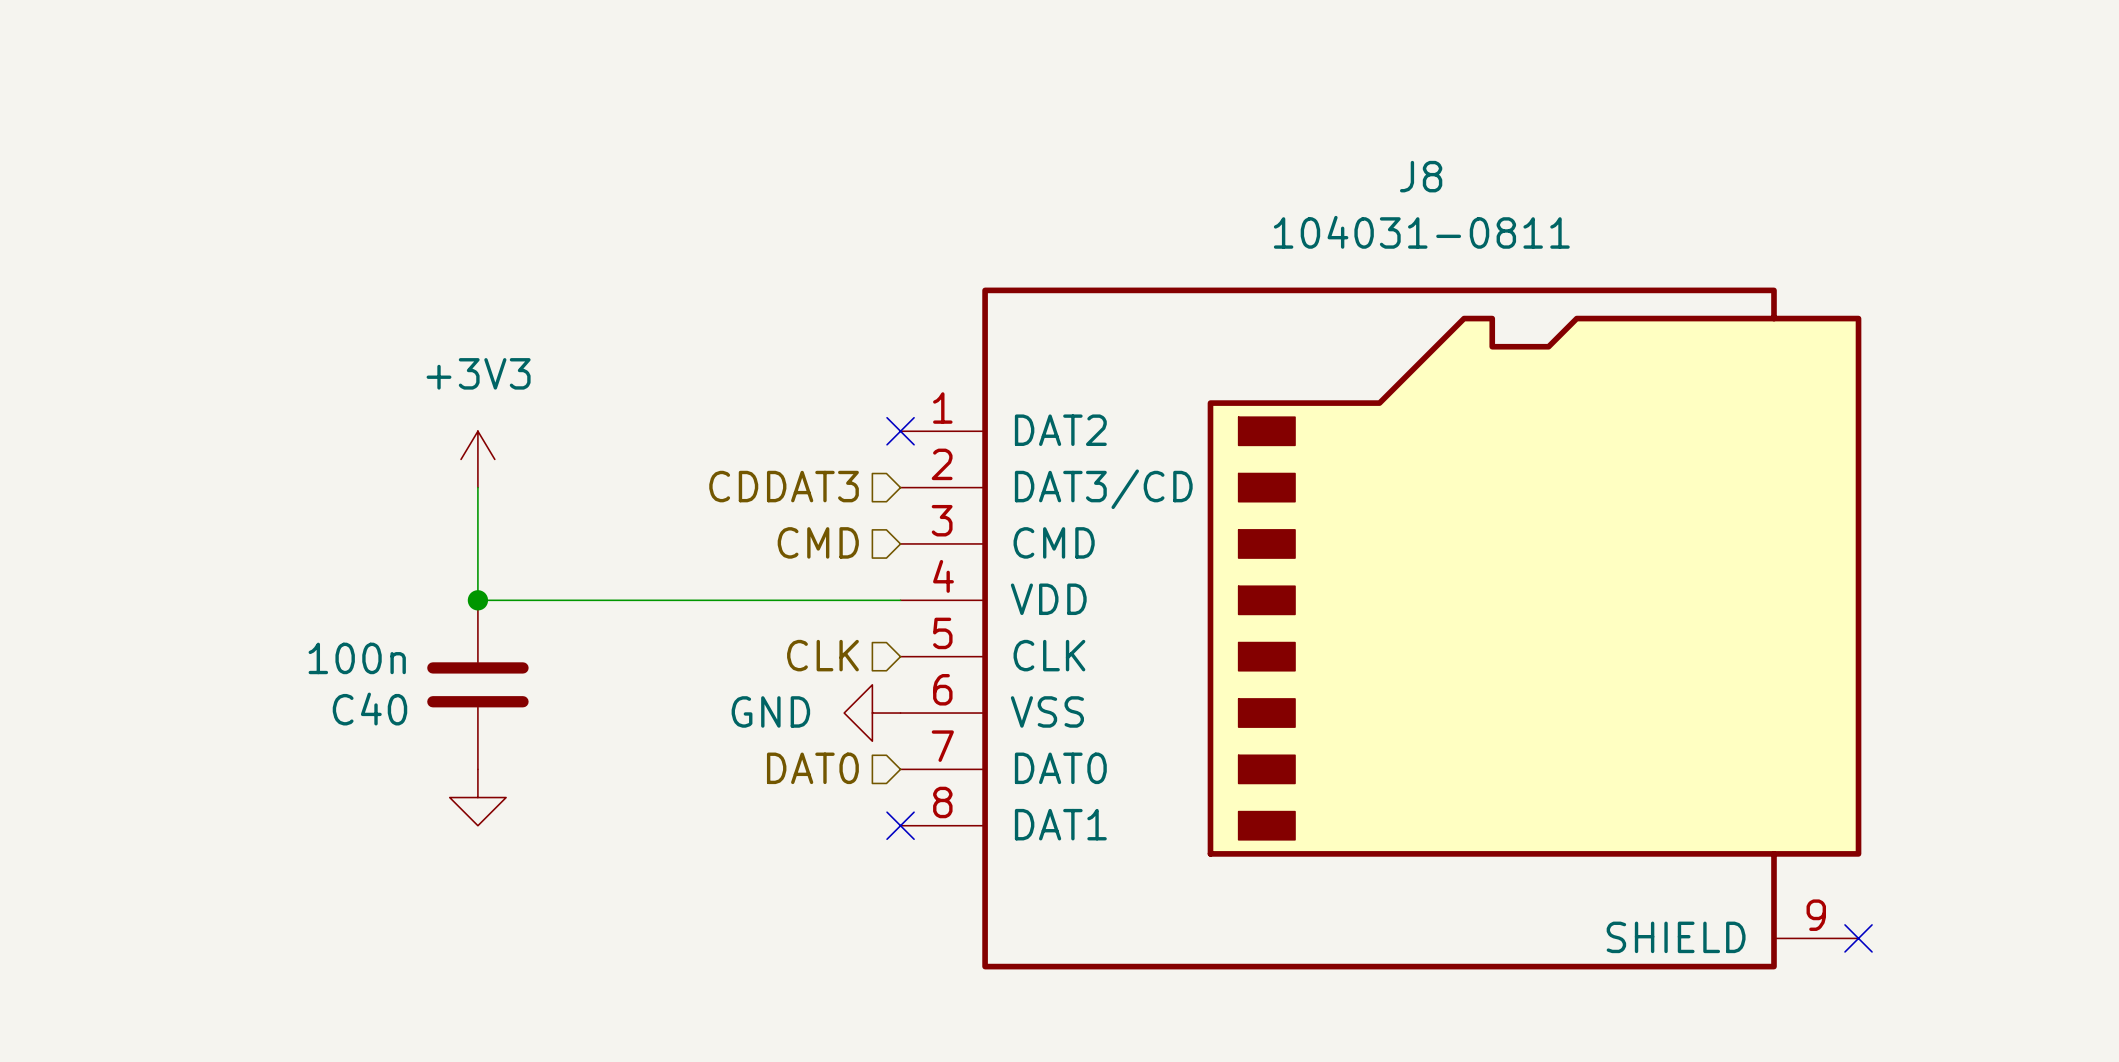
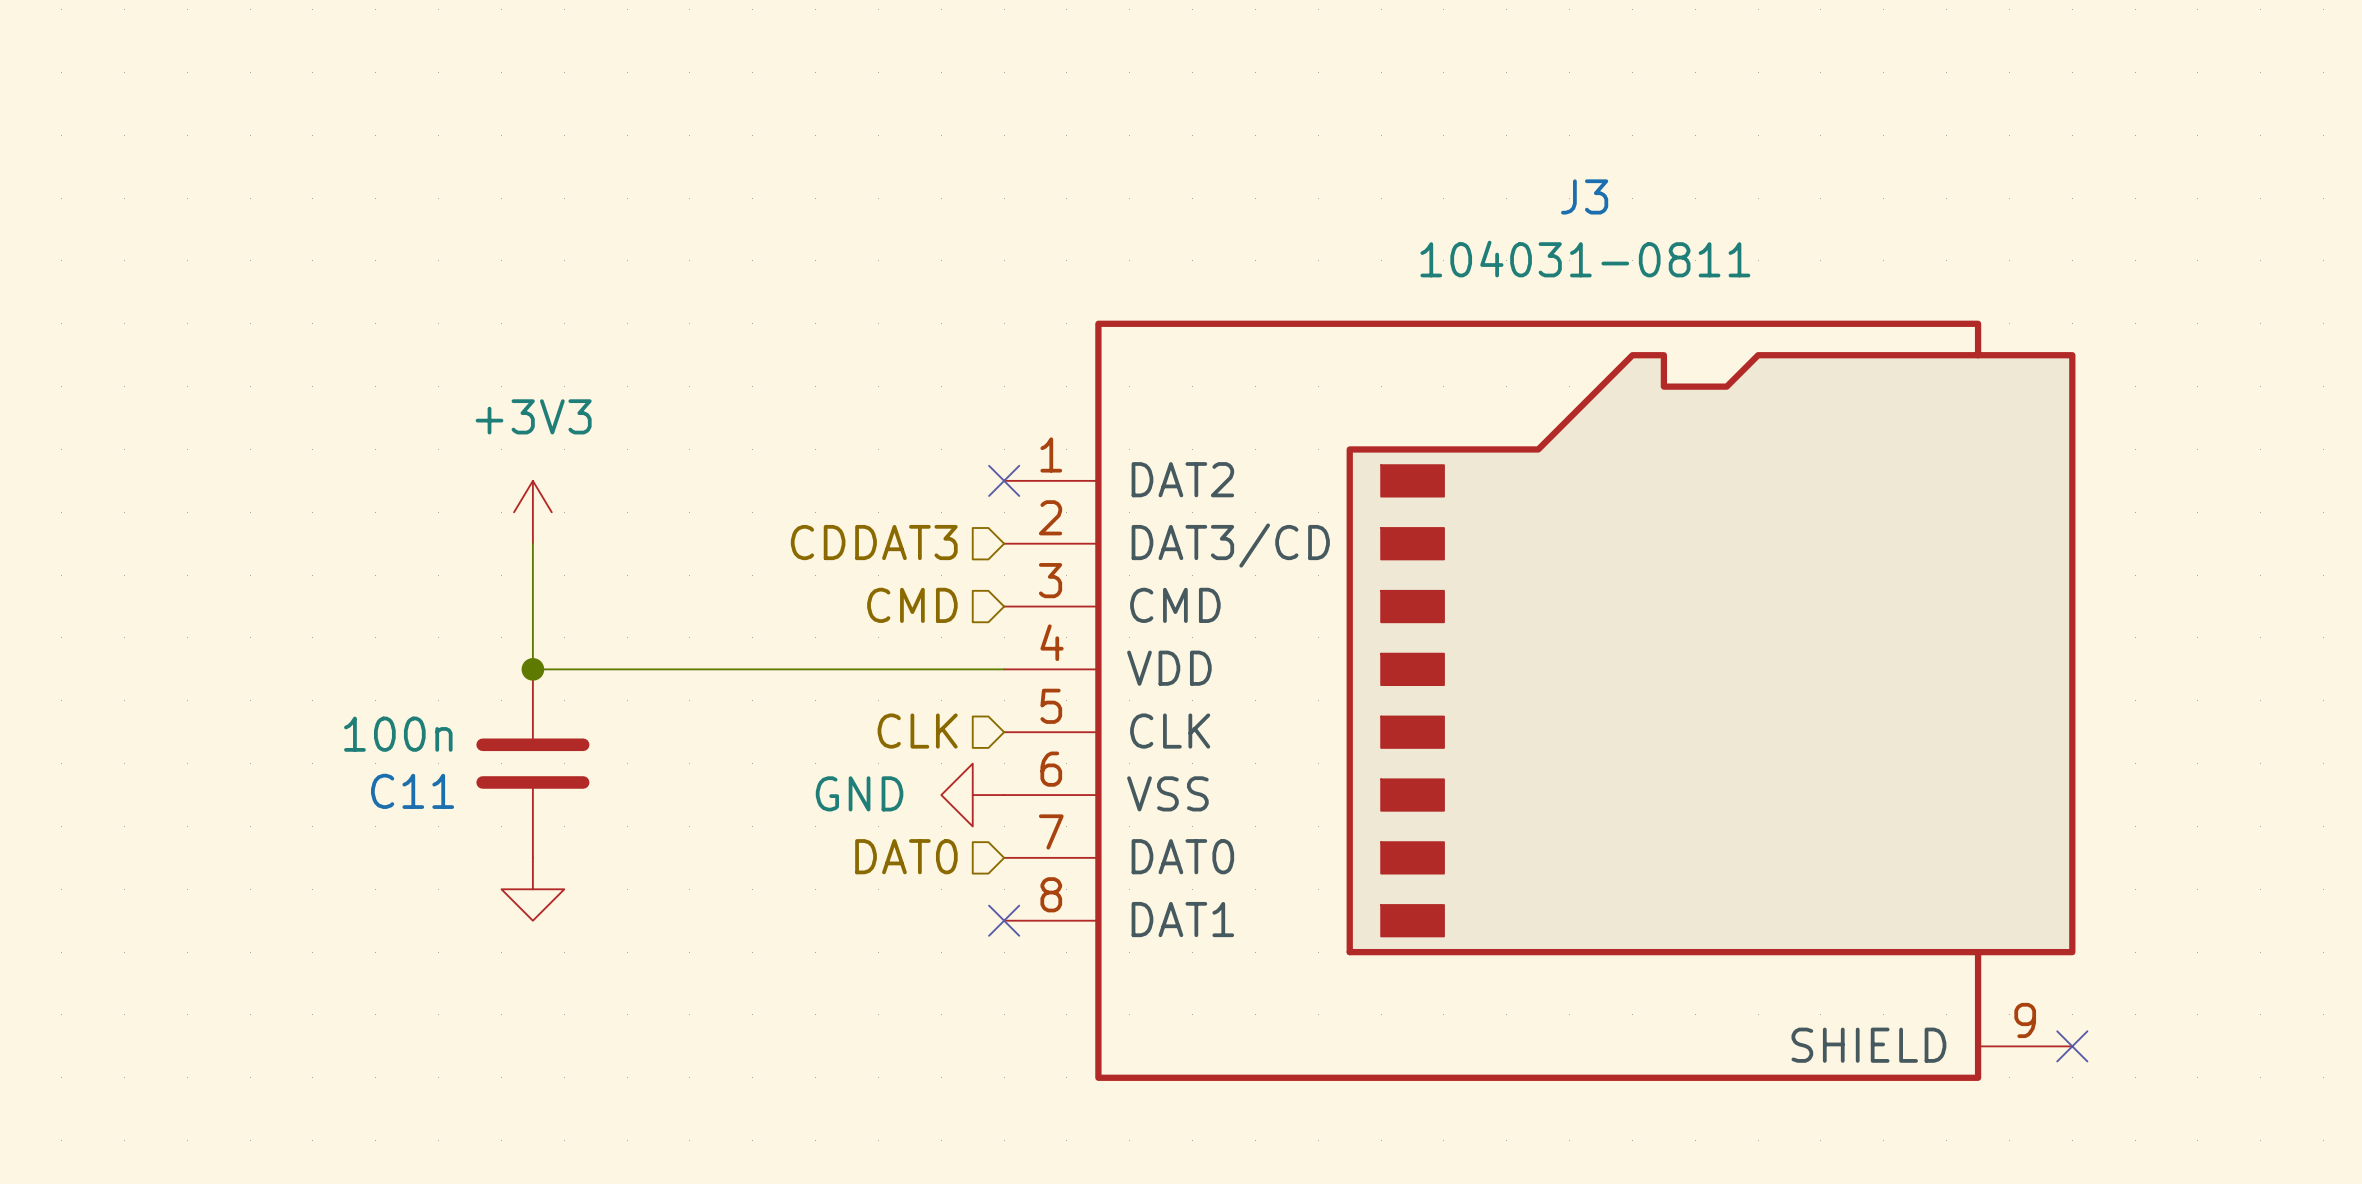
J8 name: J8 (1421, 176) -> J3 (1584, 196)
C40 name: C40 (369, 709) -> C11 (412, 791)

